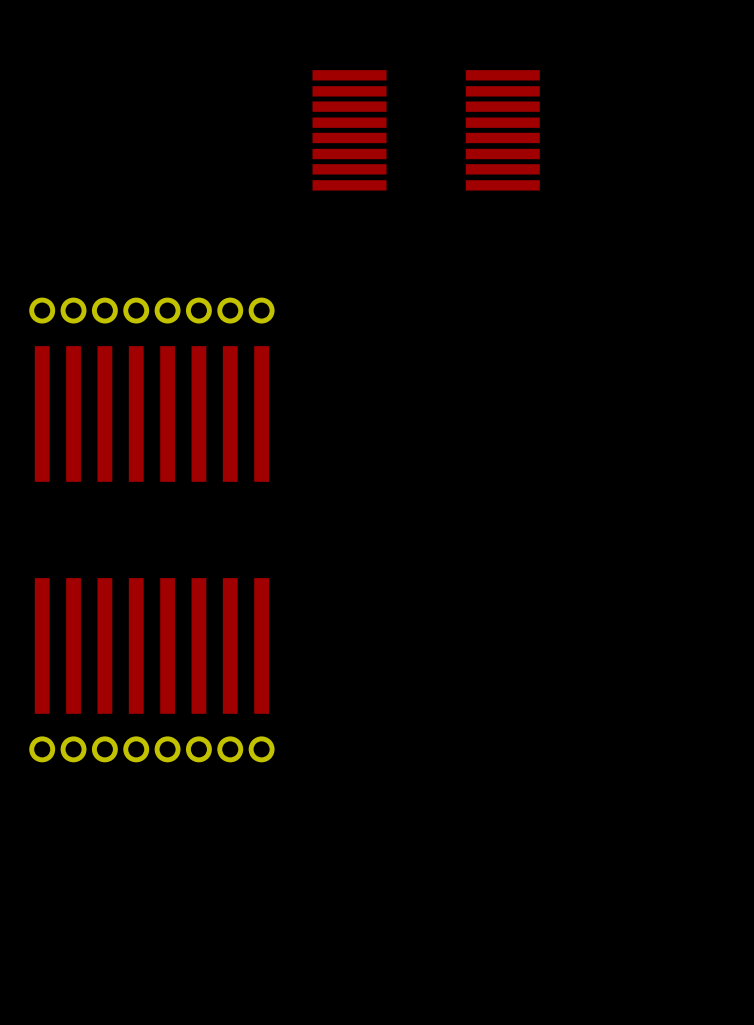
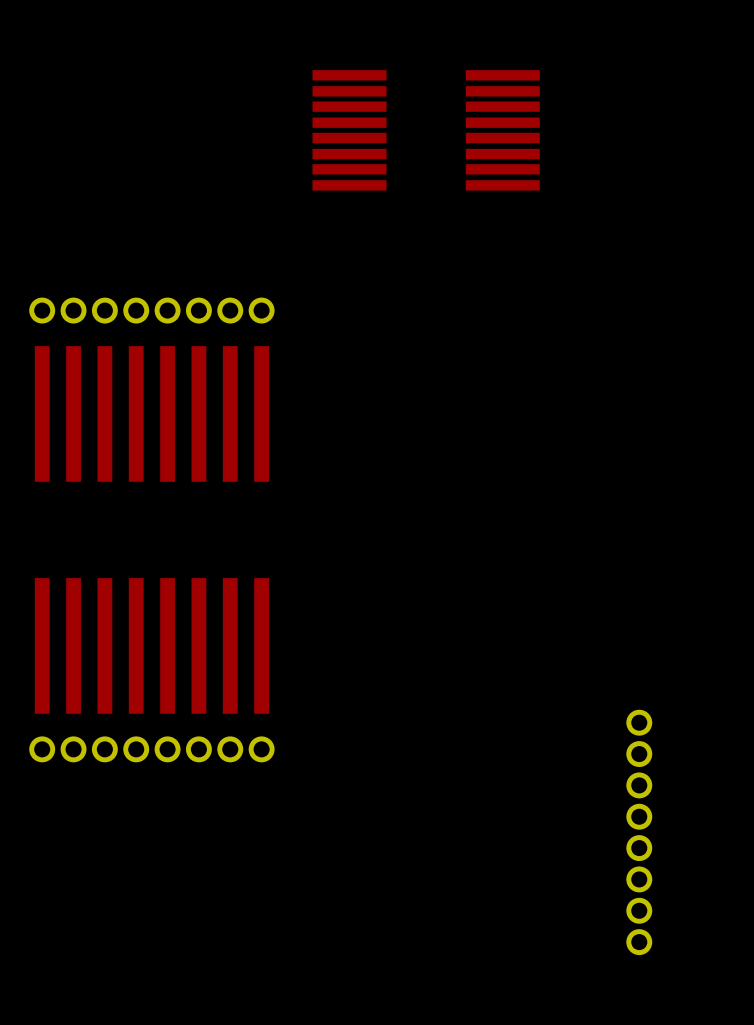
part: none -> (639, 722)
part: none -> (639, 754)
part: none -> (639, 785)
part: none -> (639, 816)
part: none -> (639, 848)
part: none -> (639, 879)
part: none -> (639, 910)
part: none -> (639, 942)

